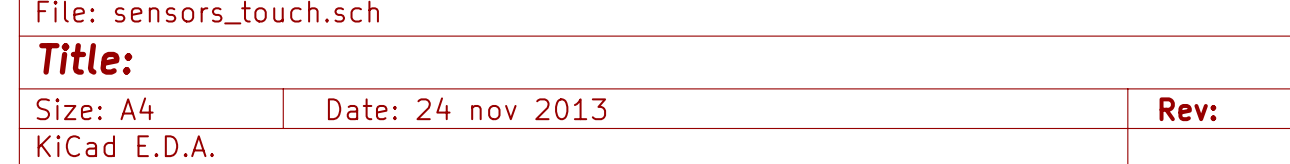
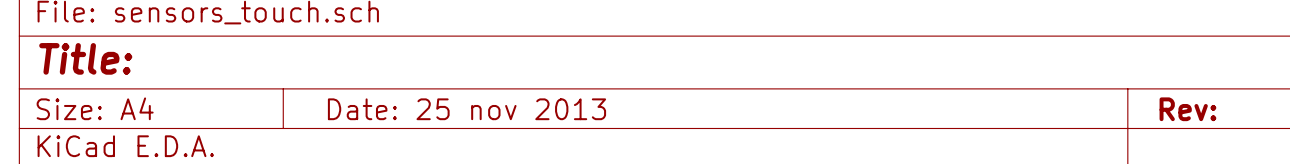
title block: Date: 24 nov 2013 (466, 108) -> Date: 25 nov 2013 (466, 109)

